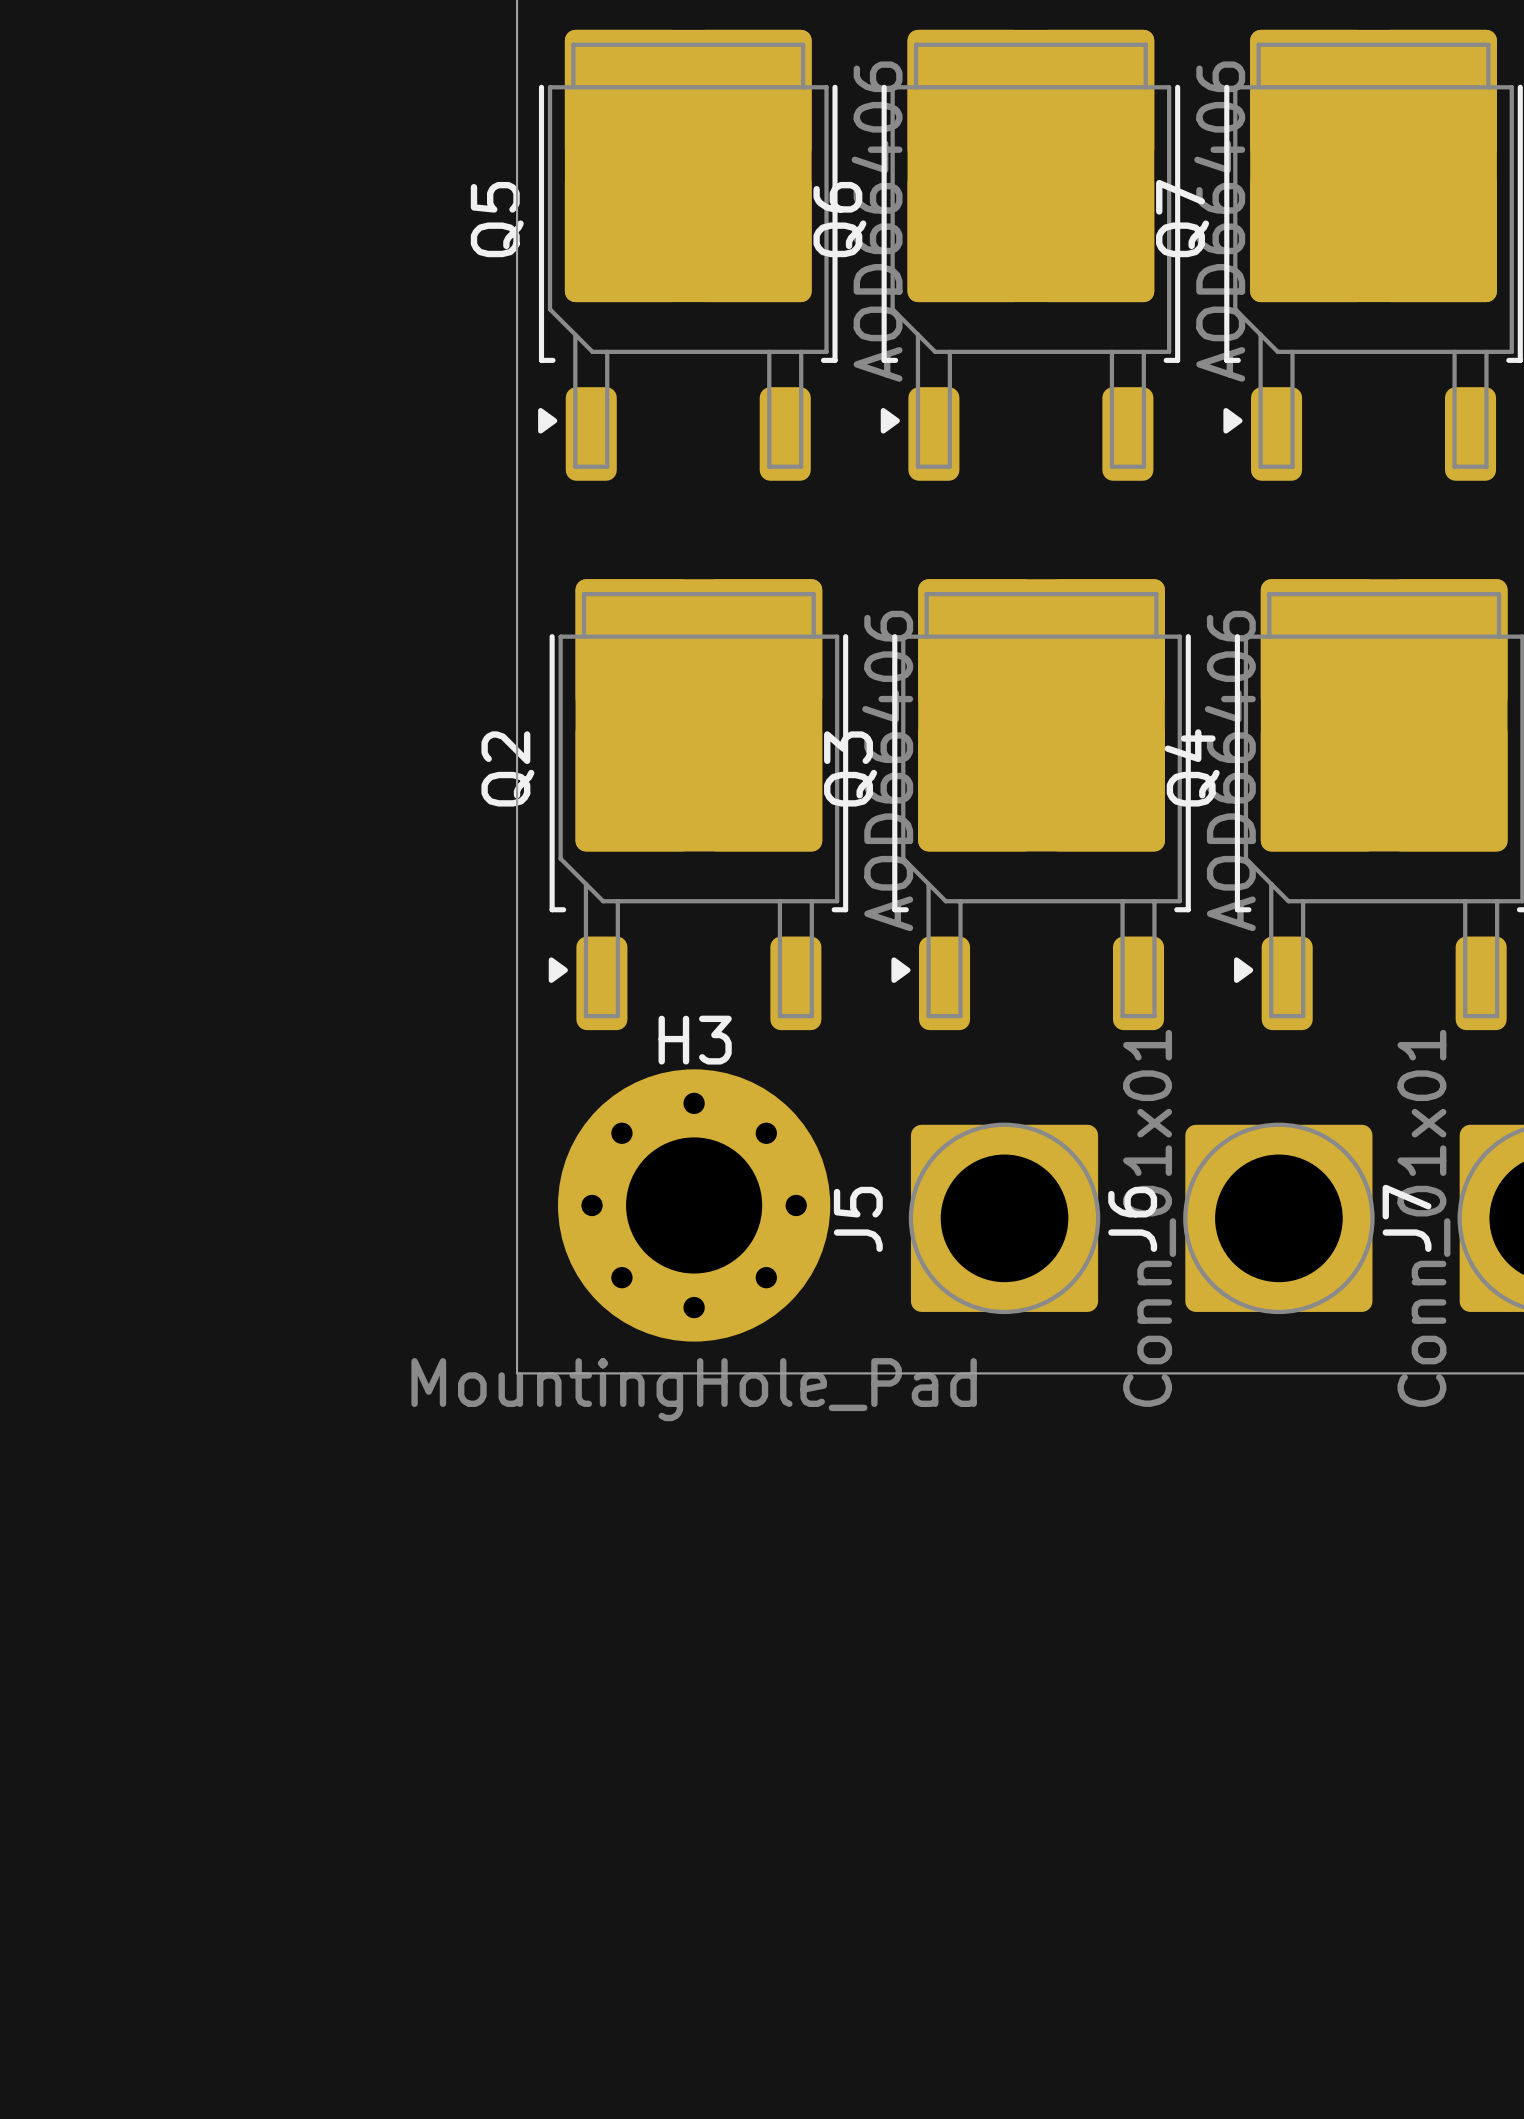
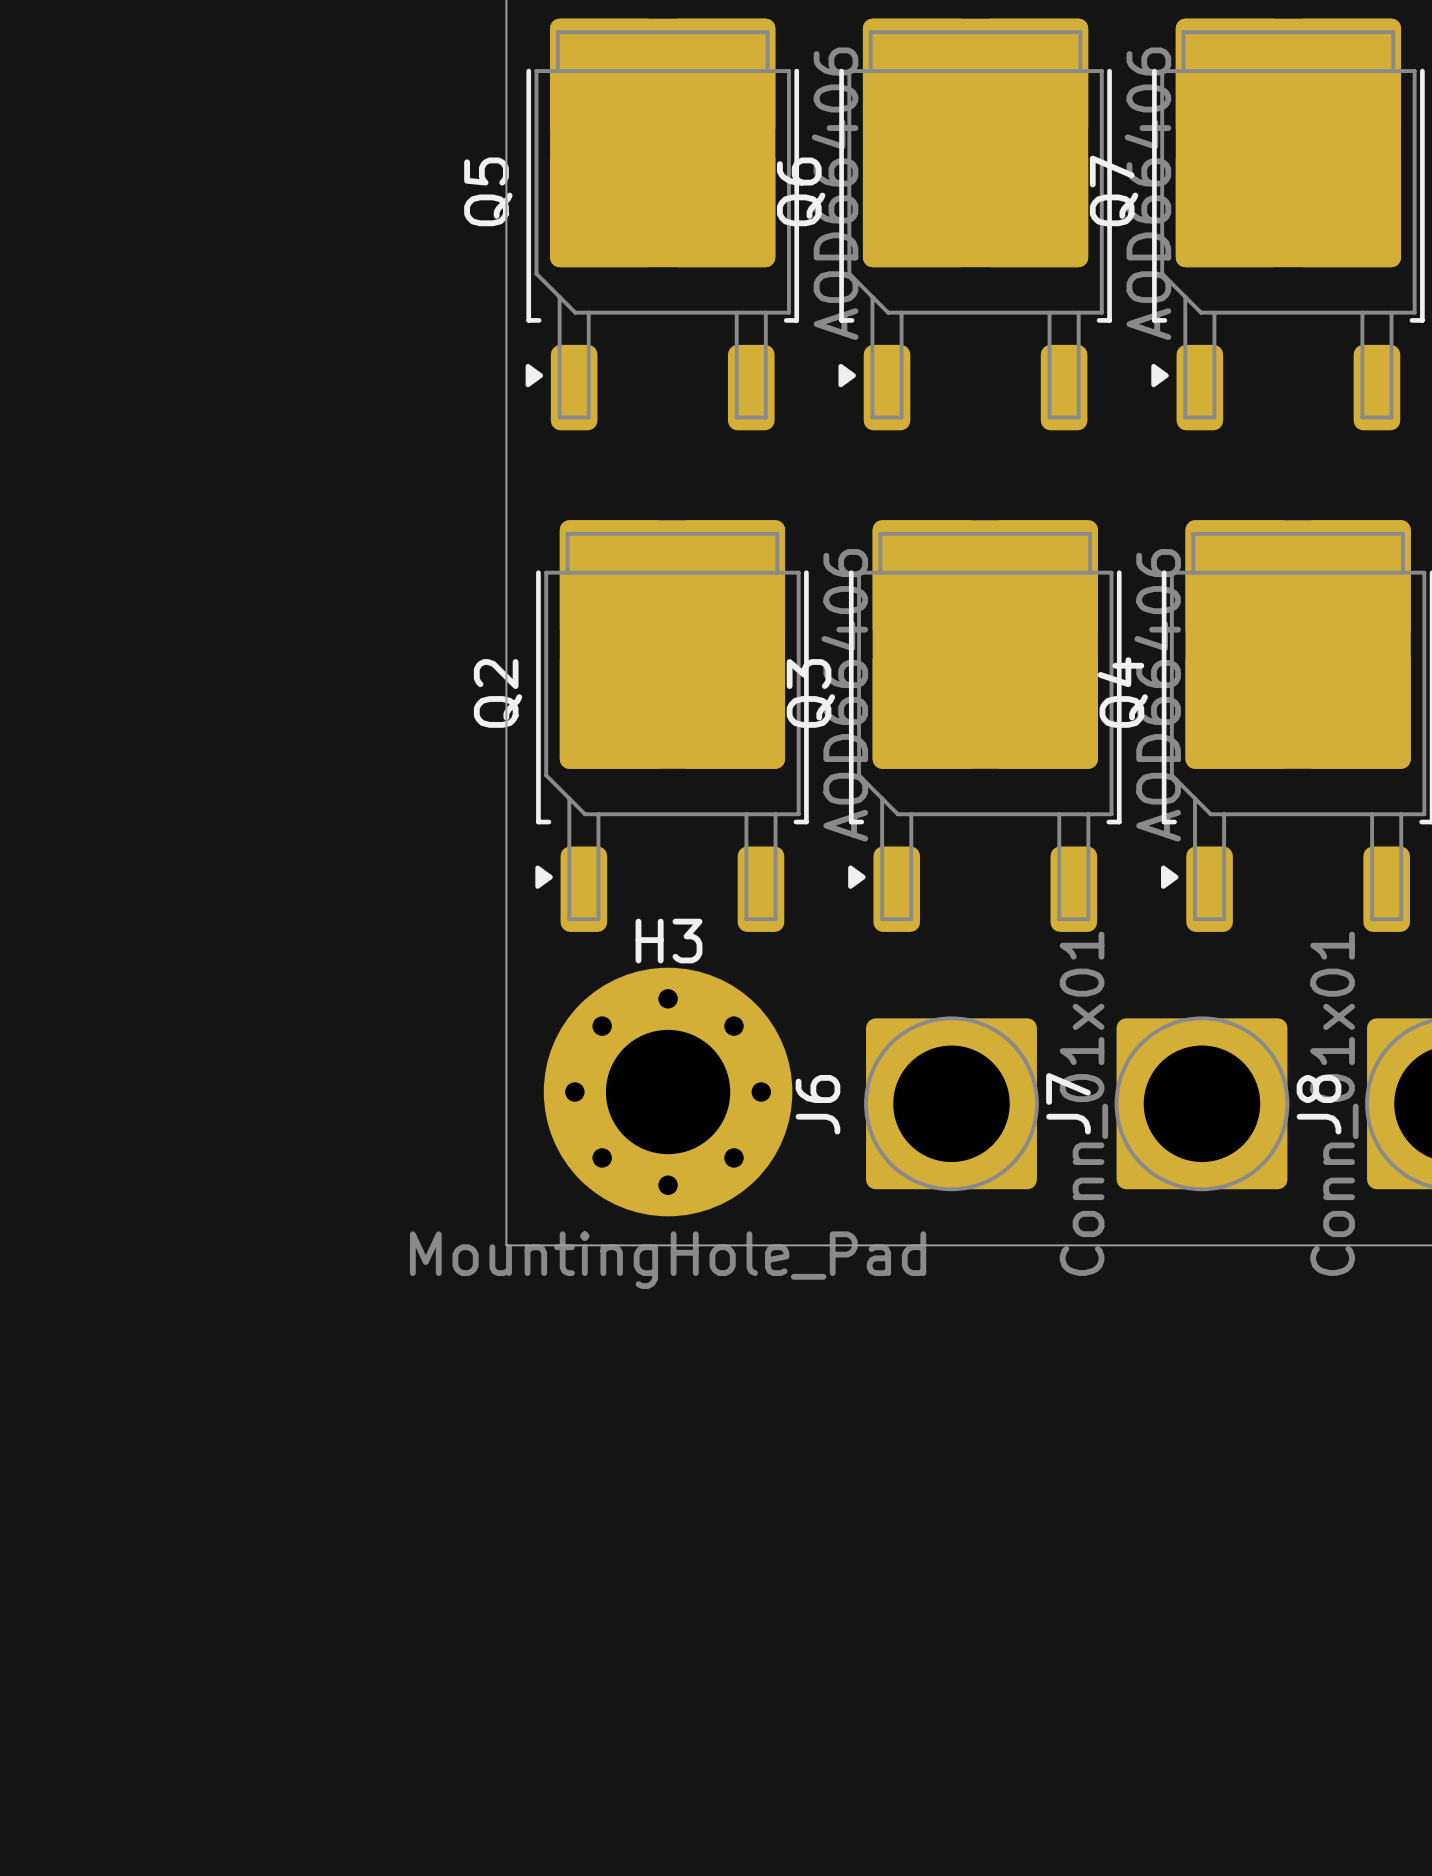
J7 name: J7 (1407, 1218) -> J8 (1318, 1104)
J5 name: J5 (858, 1219) -> J6 (817, 1104)
J6 name: J6 (1132, 1219) -> J7 (1068, 1103)

